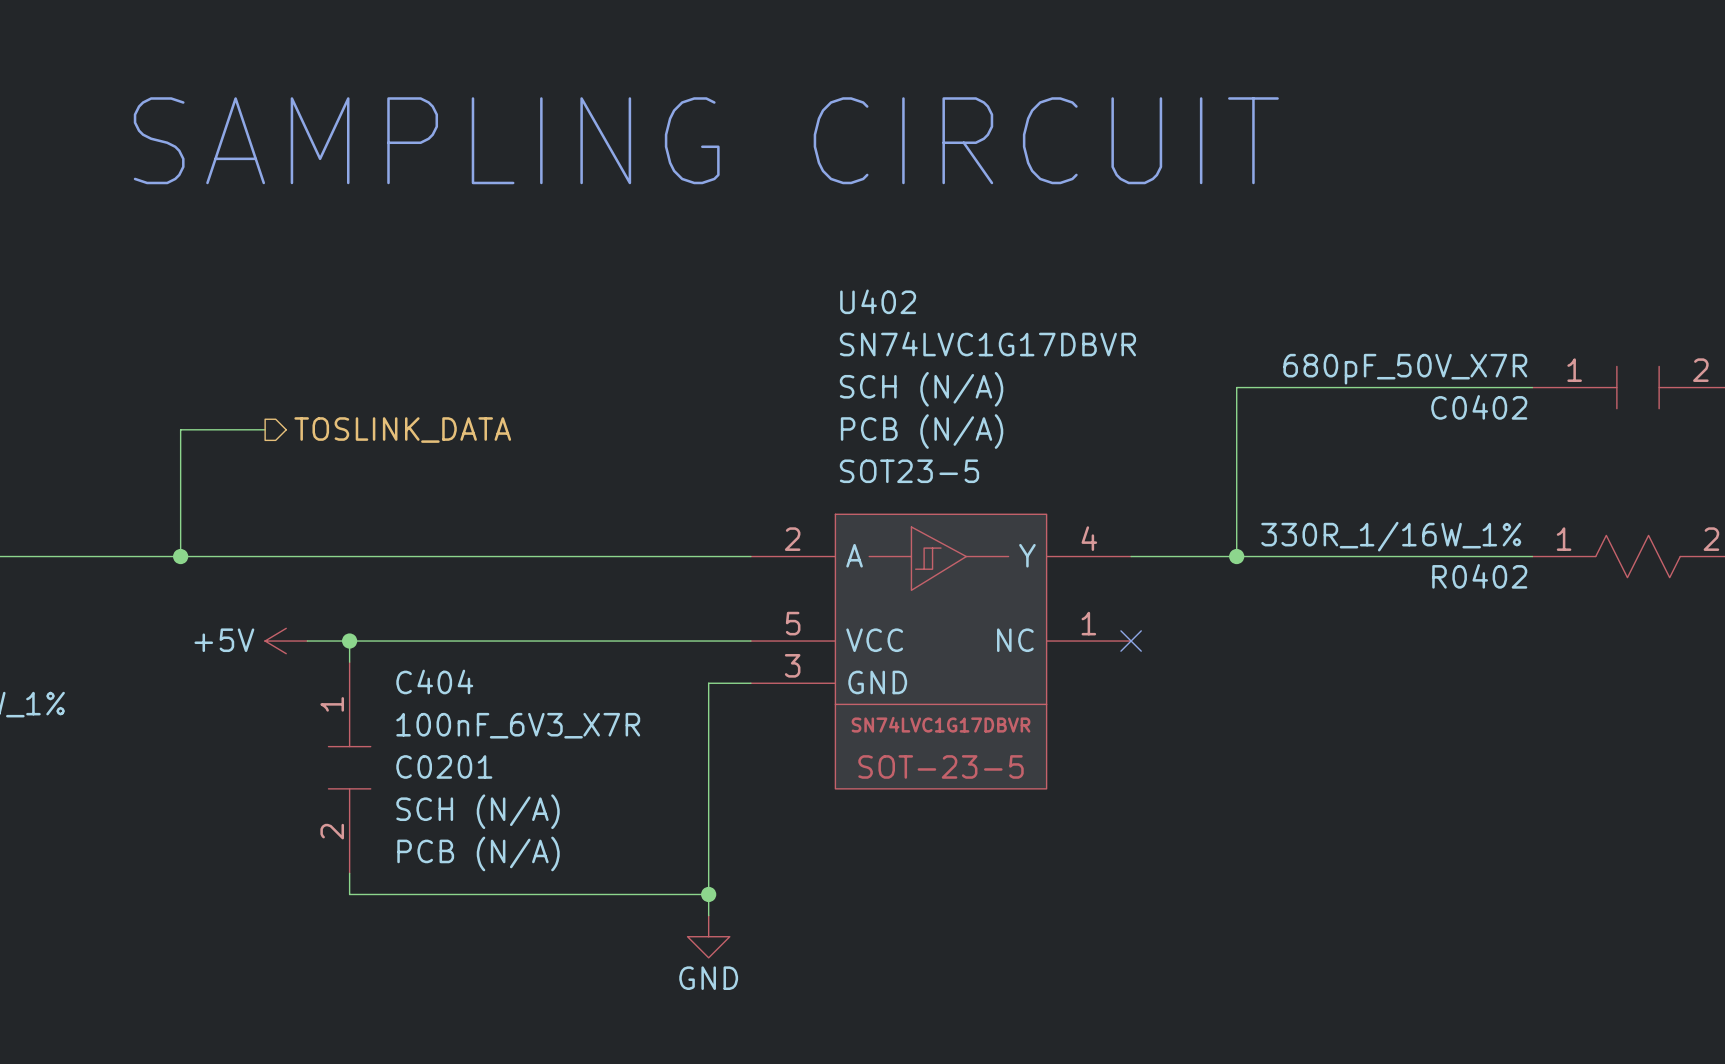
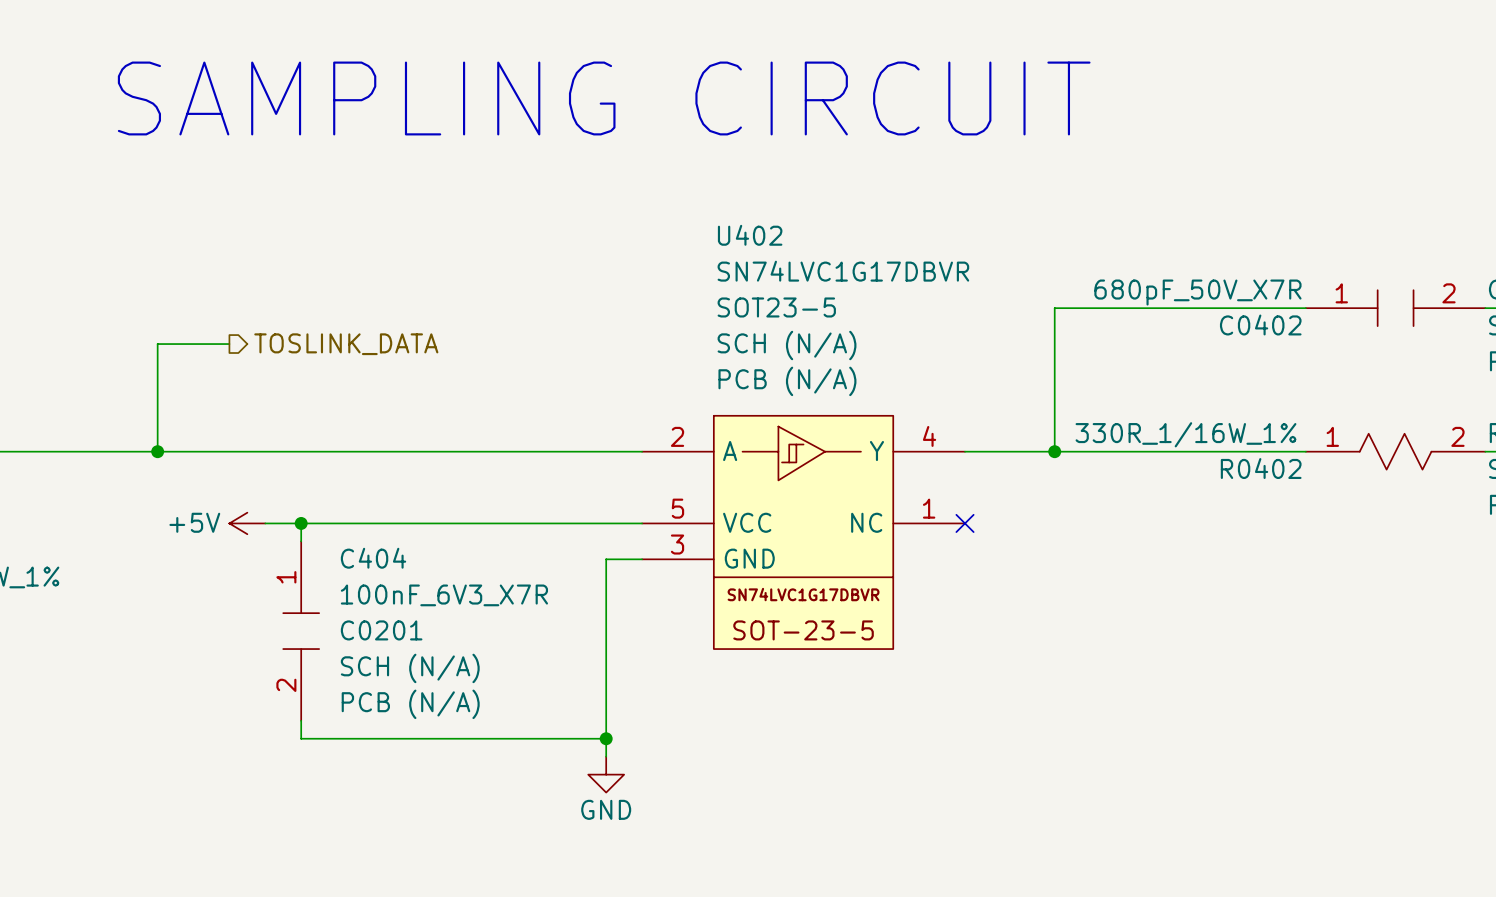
U402 text position: SCH (N/A) (921, 389) -> SCH (N/A) (787, 345)
U402 text position: PCB (N/A) (922, 431) -> PCB (N/A) (787, 381)
U402 text position: SOT23-5 (909, 471) -> SOT23-5 (776, 307)

